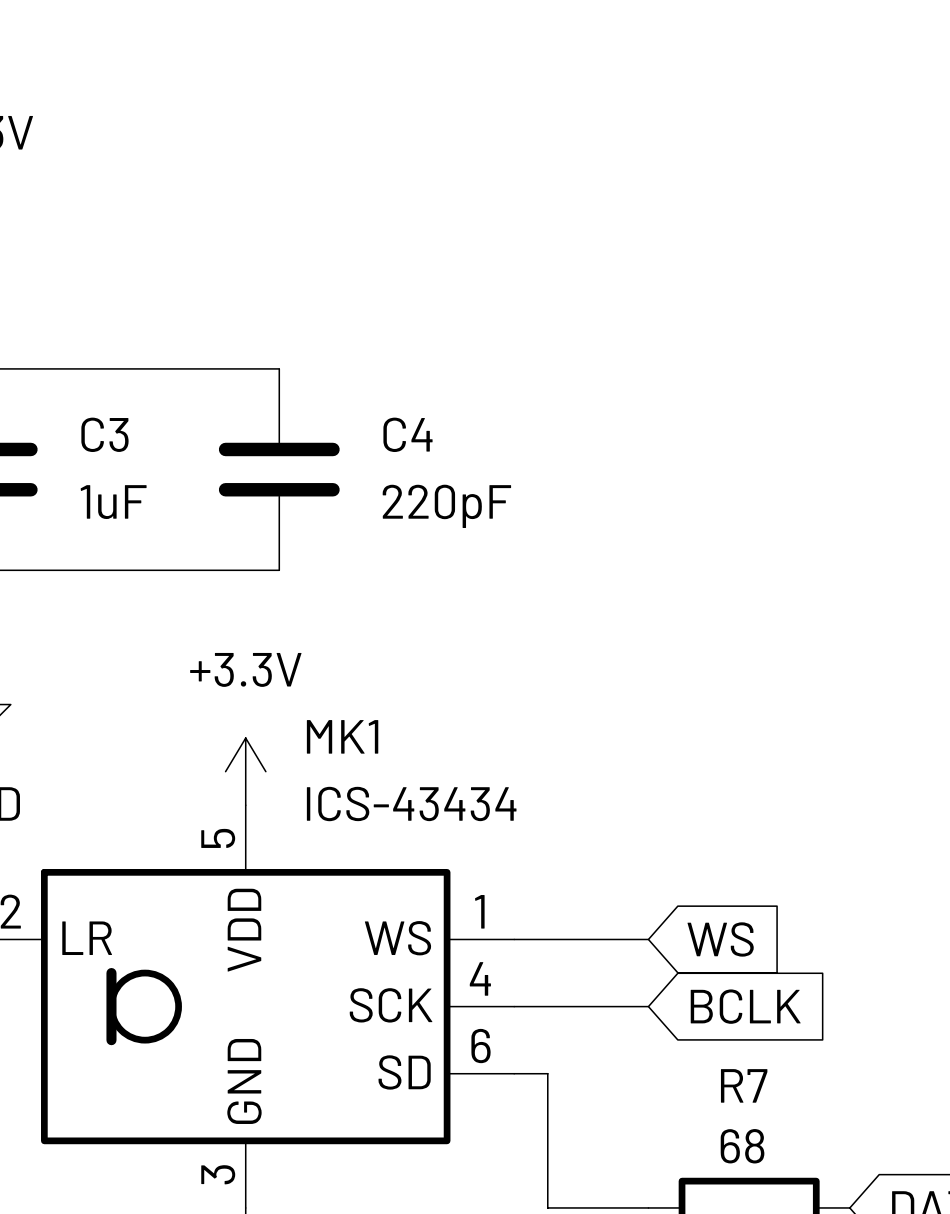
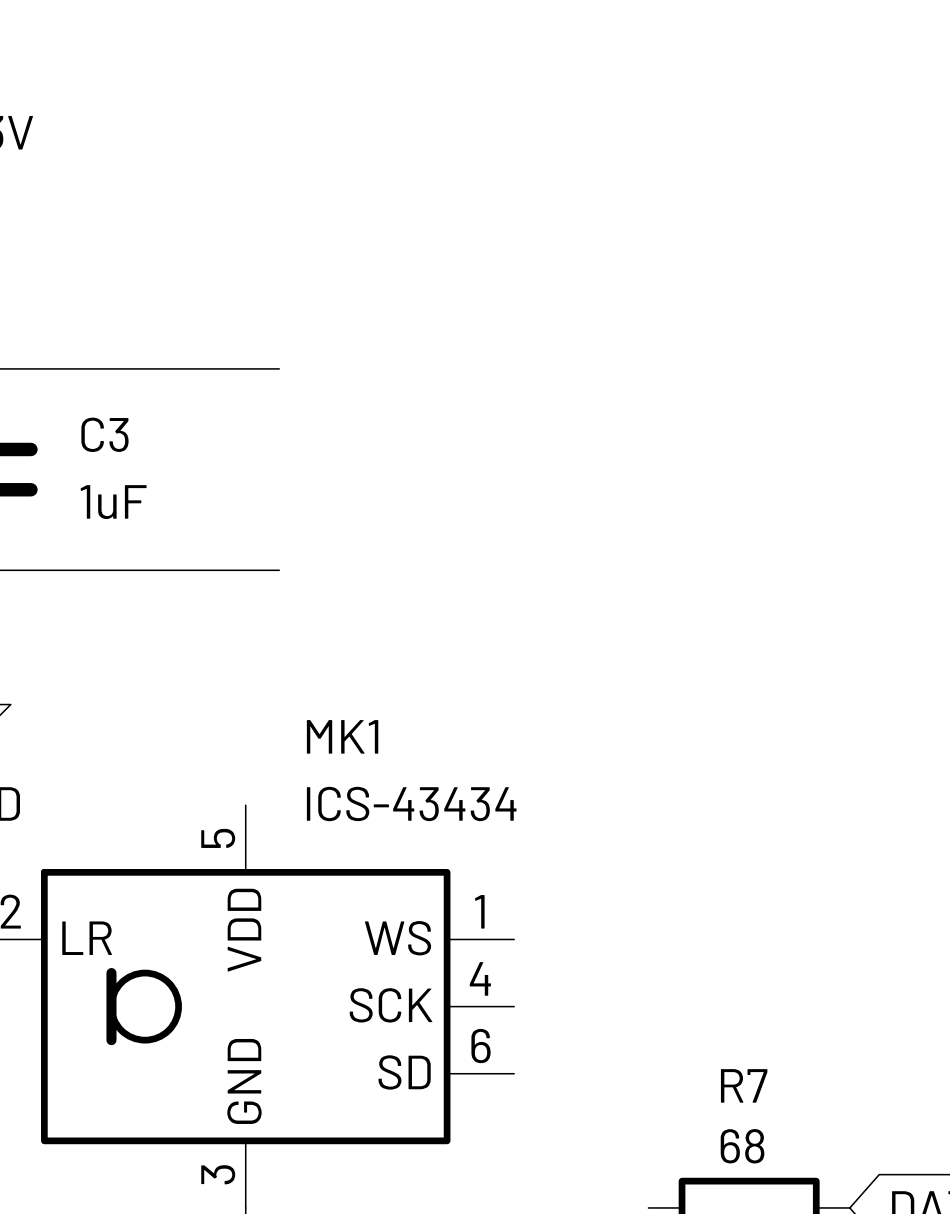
C4: 220pF (279, 469) -> none
power symbol: +3.3V (245, 771) -> none
wire: (514, 939) (648, 939) -> none
global label: WS (720, 939) -> none
wire: (514, 1006) (648, 1006) -> none
global label: BCLK (745, 1006) -> none
wire: (514, 1073) (547, 1073) (547, 1207) (648, 1207) -> none

